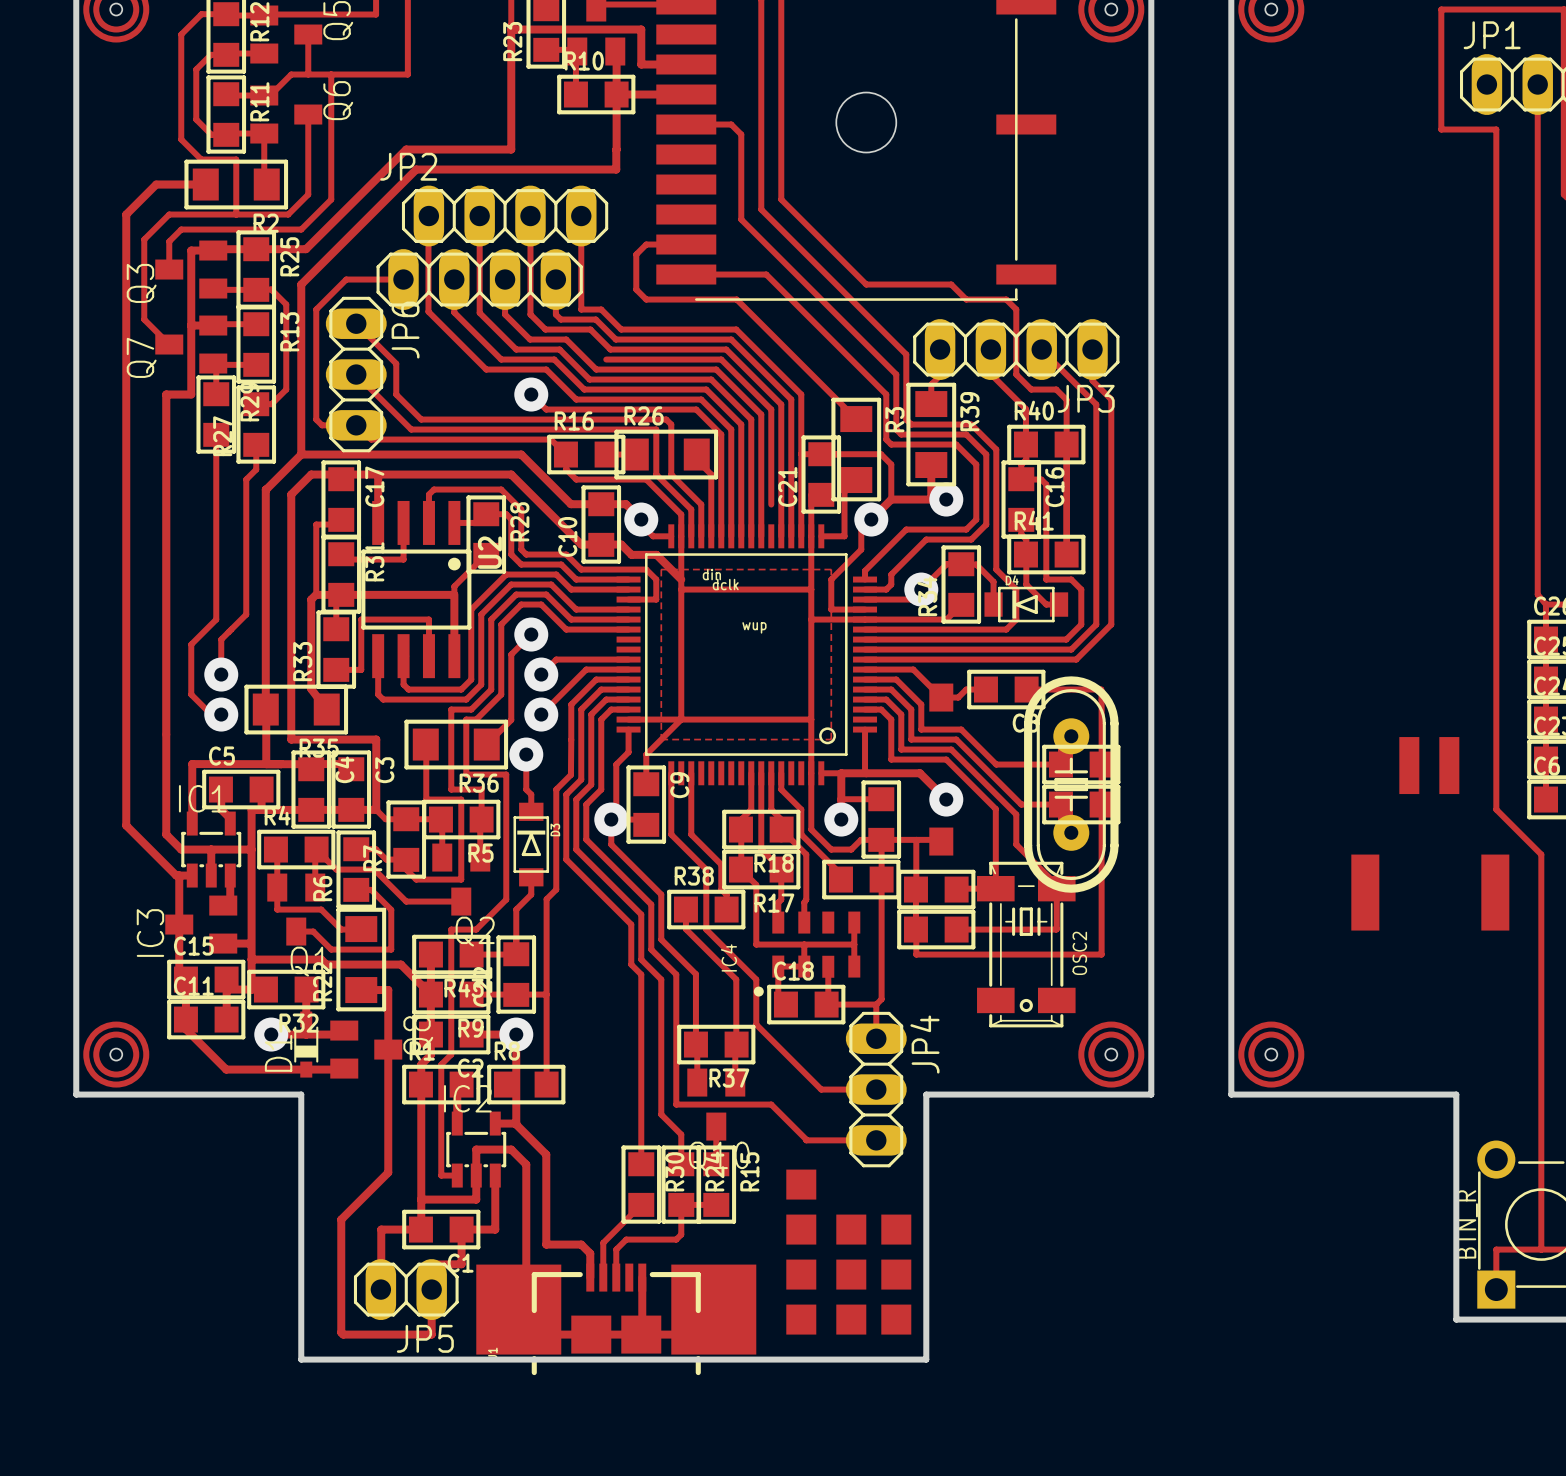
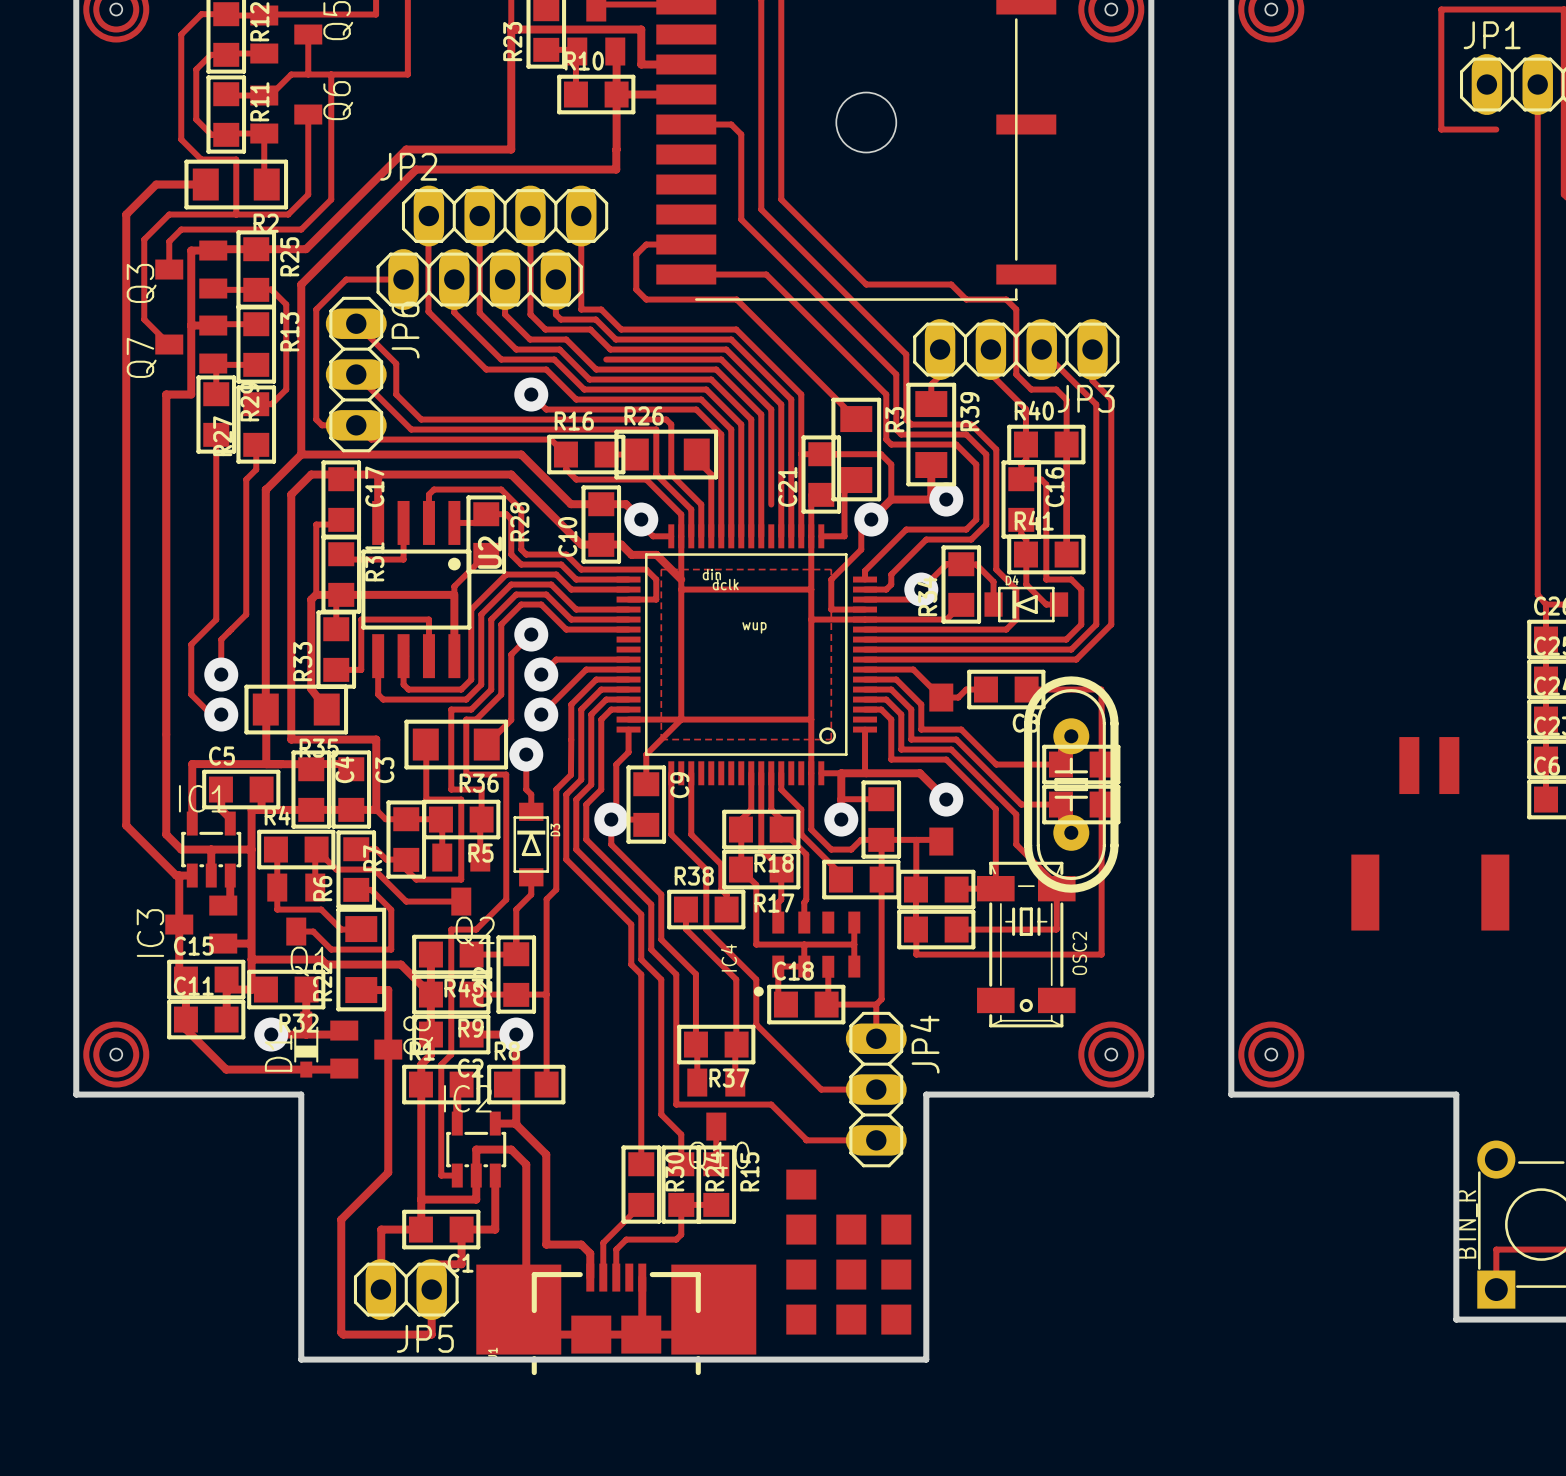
track: (1496, 129) (1496, 809) (1541, 854) (1541, 1249) -> none

